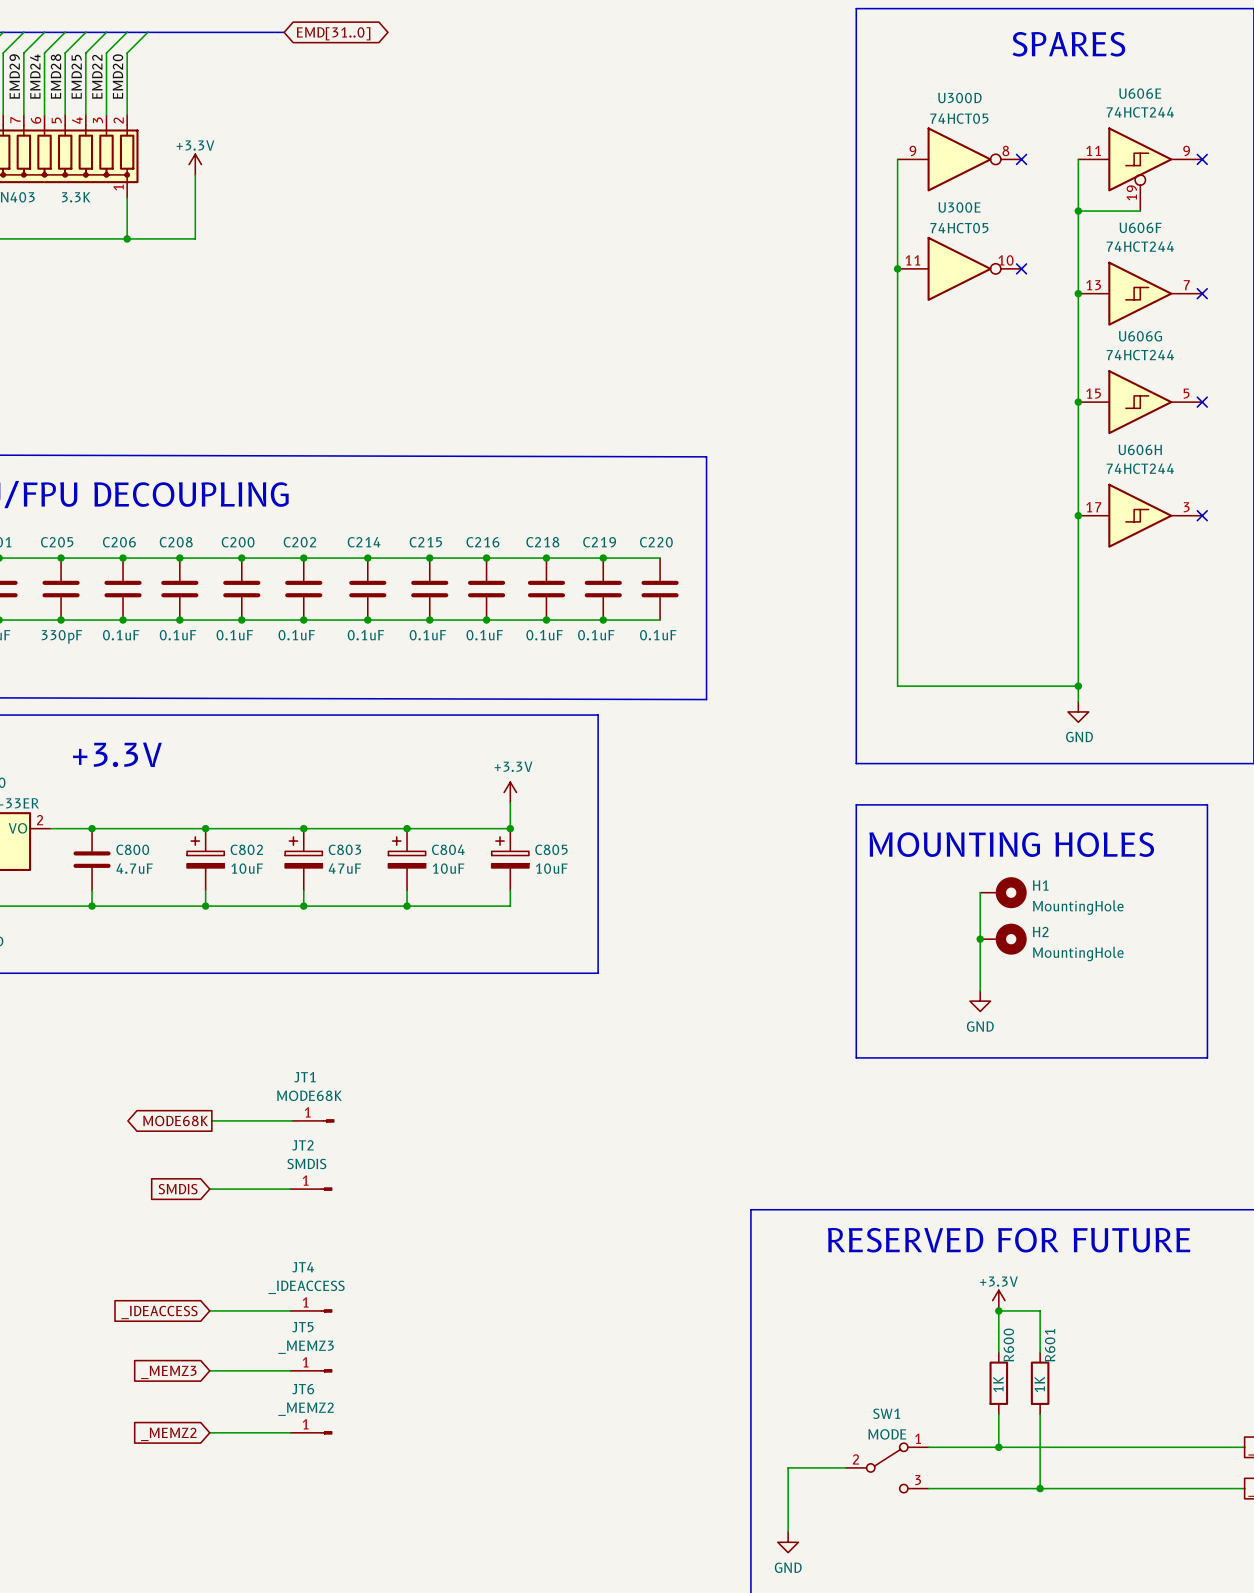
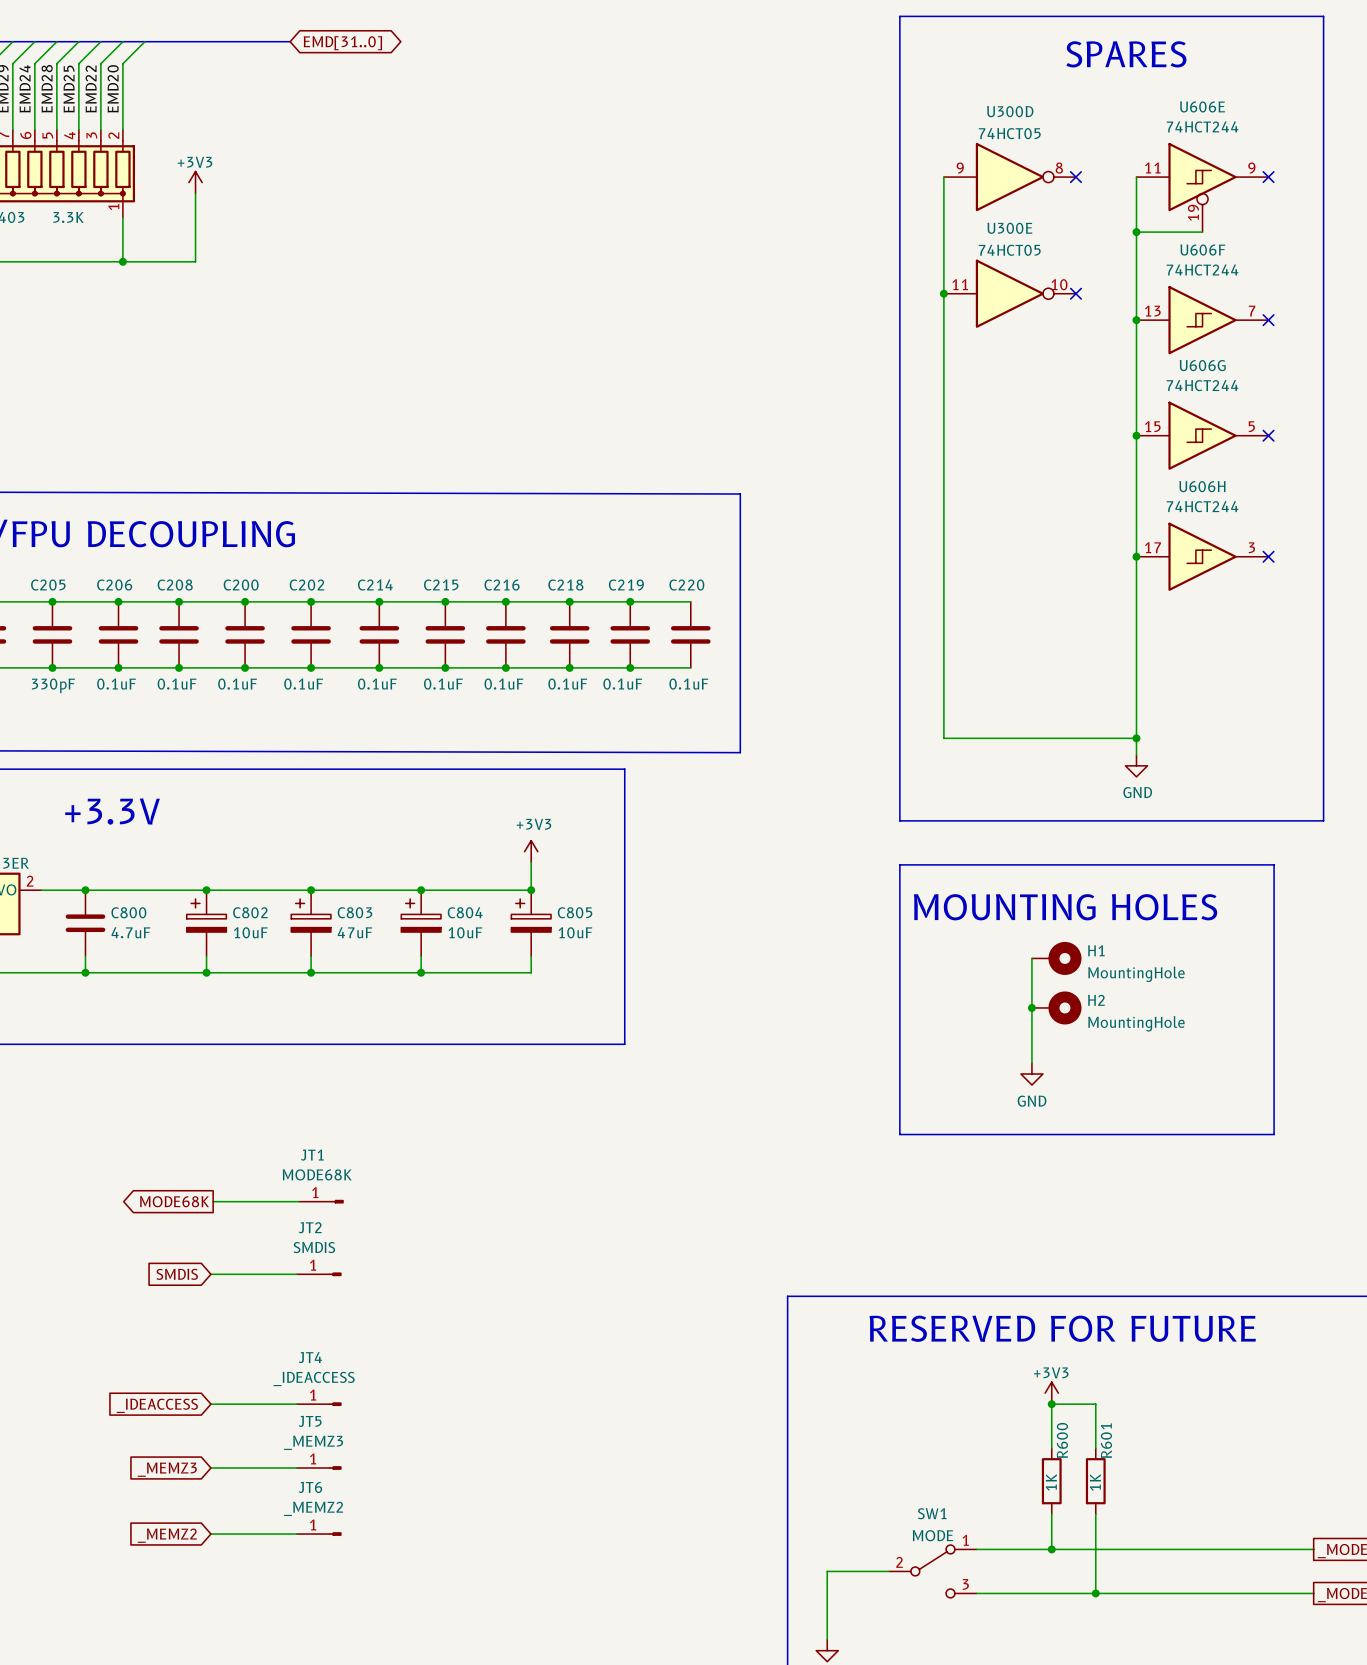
power symbol: +3.3V (195, 164) -> +3V3 (195, 182)
power symbol: +3.3V (510, 792) -> +3V3 (531, 851)
power symbol: +3.3V (998, 1300) -> +3V3 (1051, 1393)

